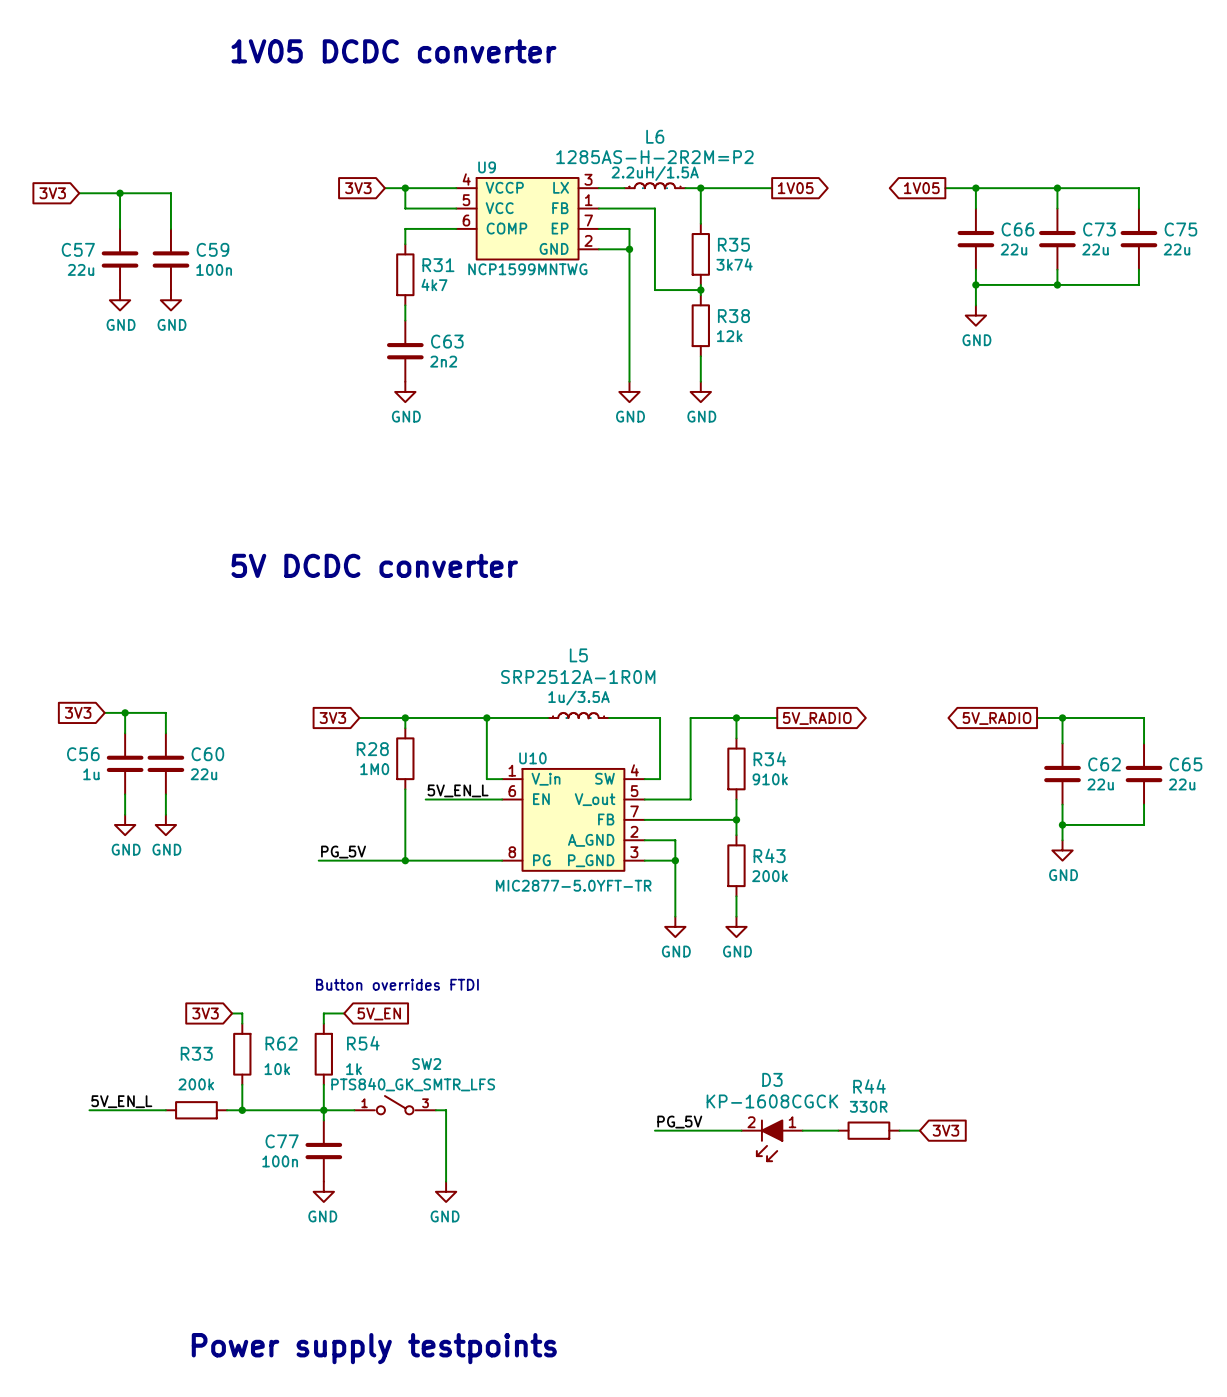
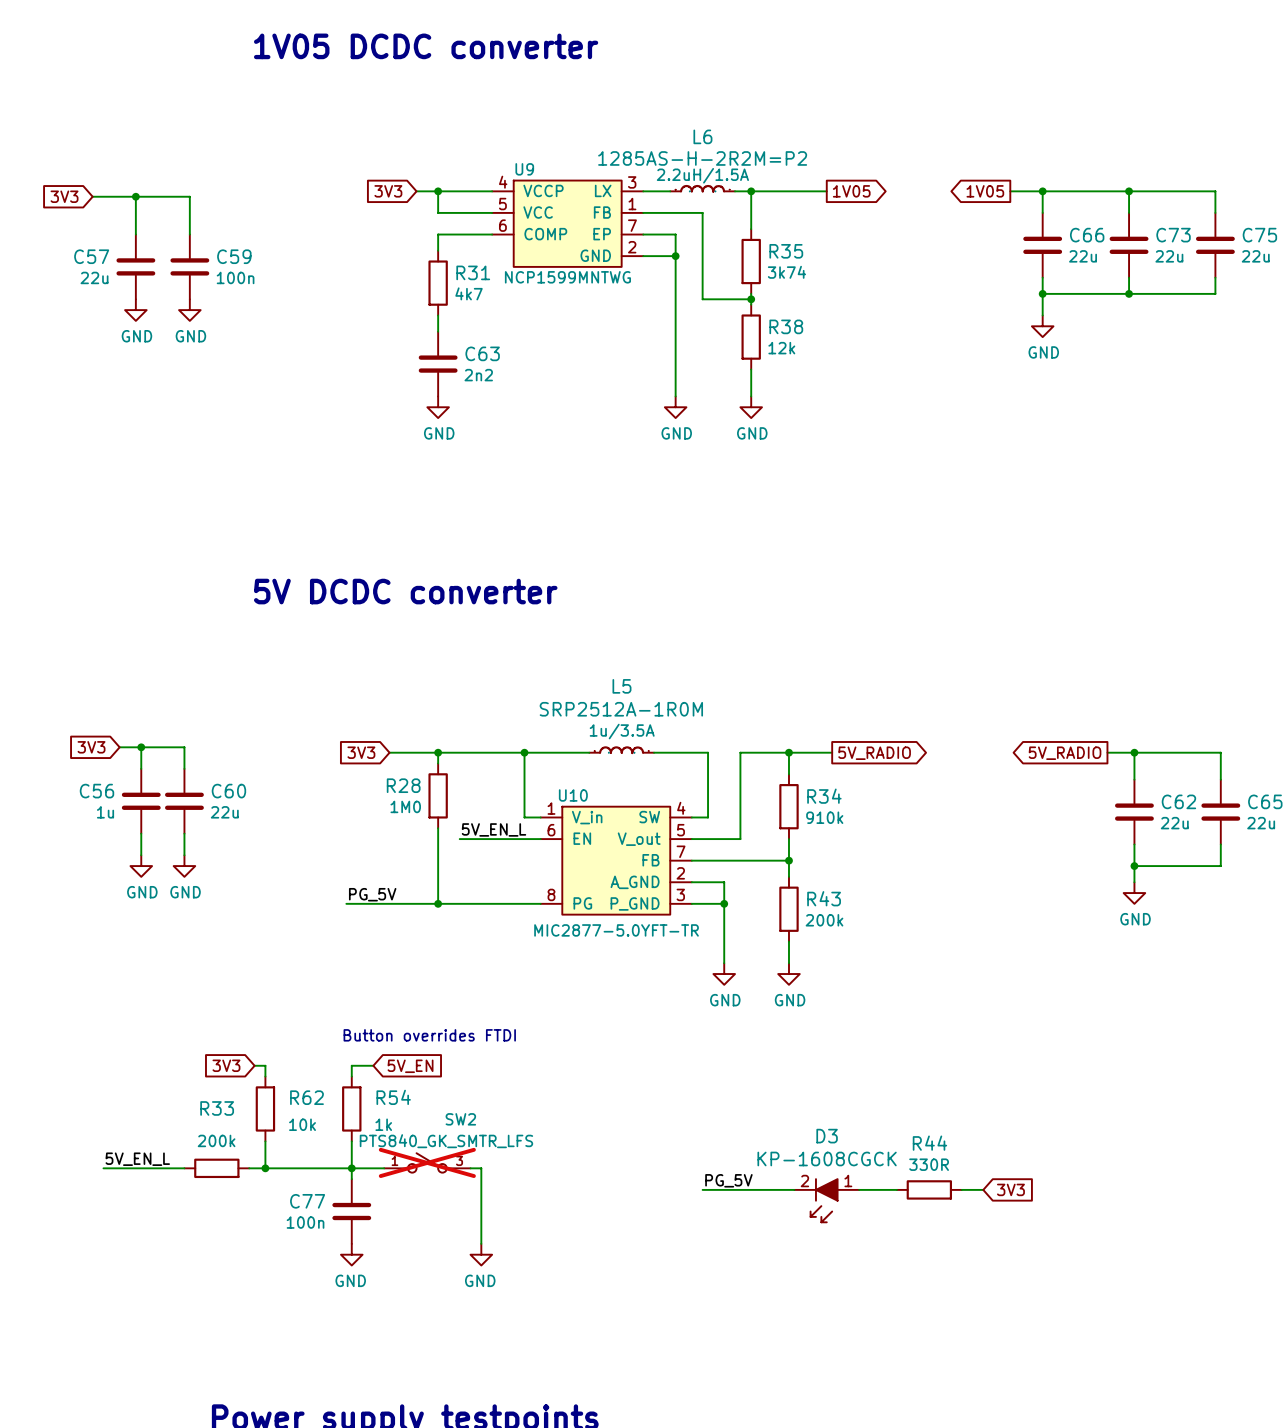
SW2 do-not-place cross: none -> (427, 1162)

